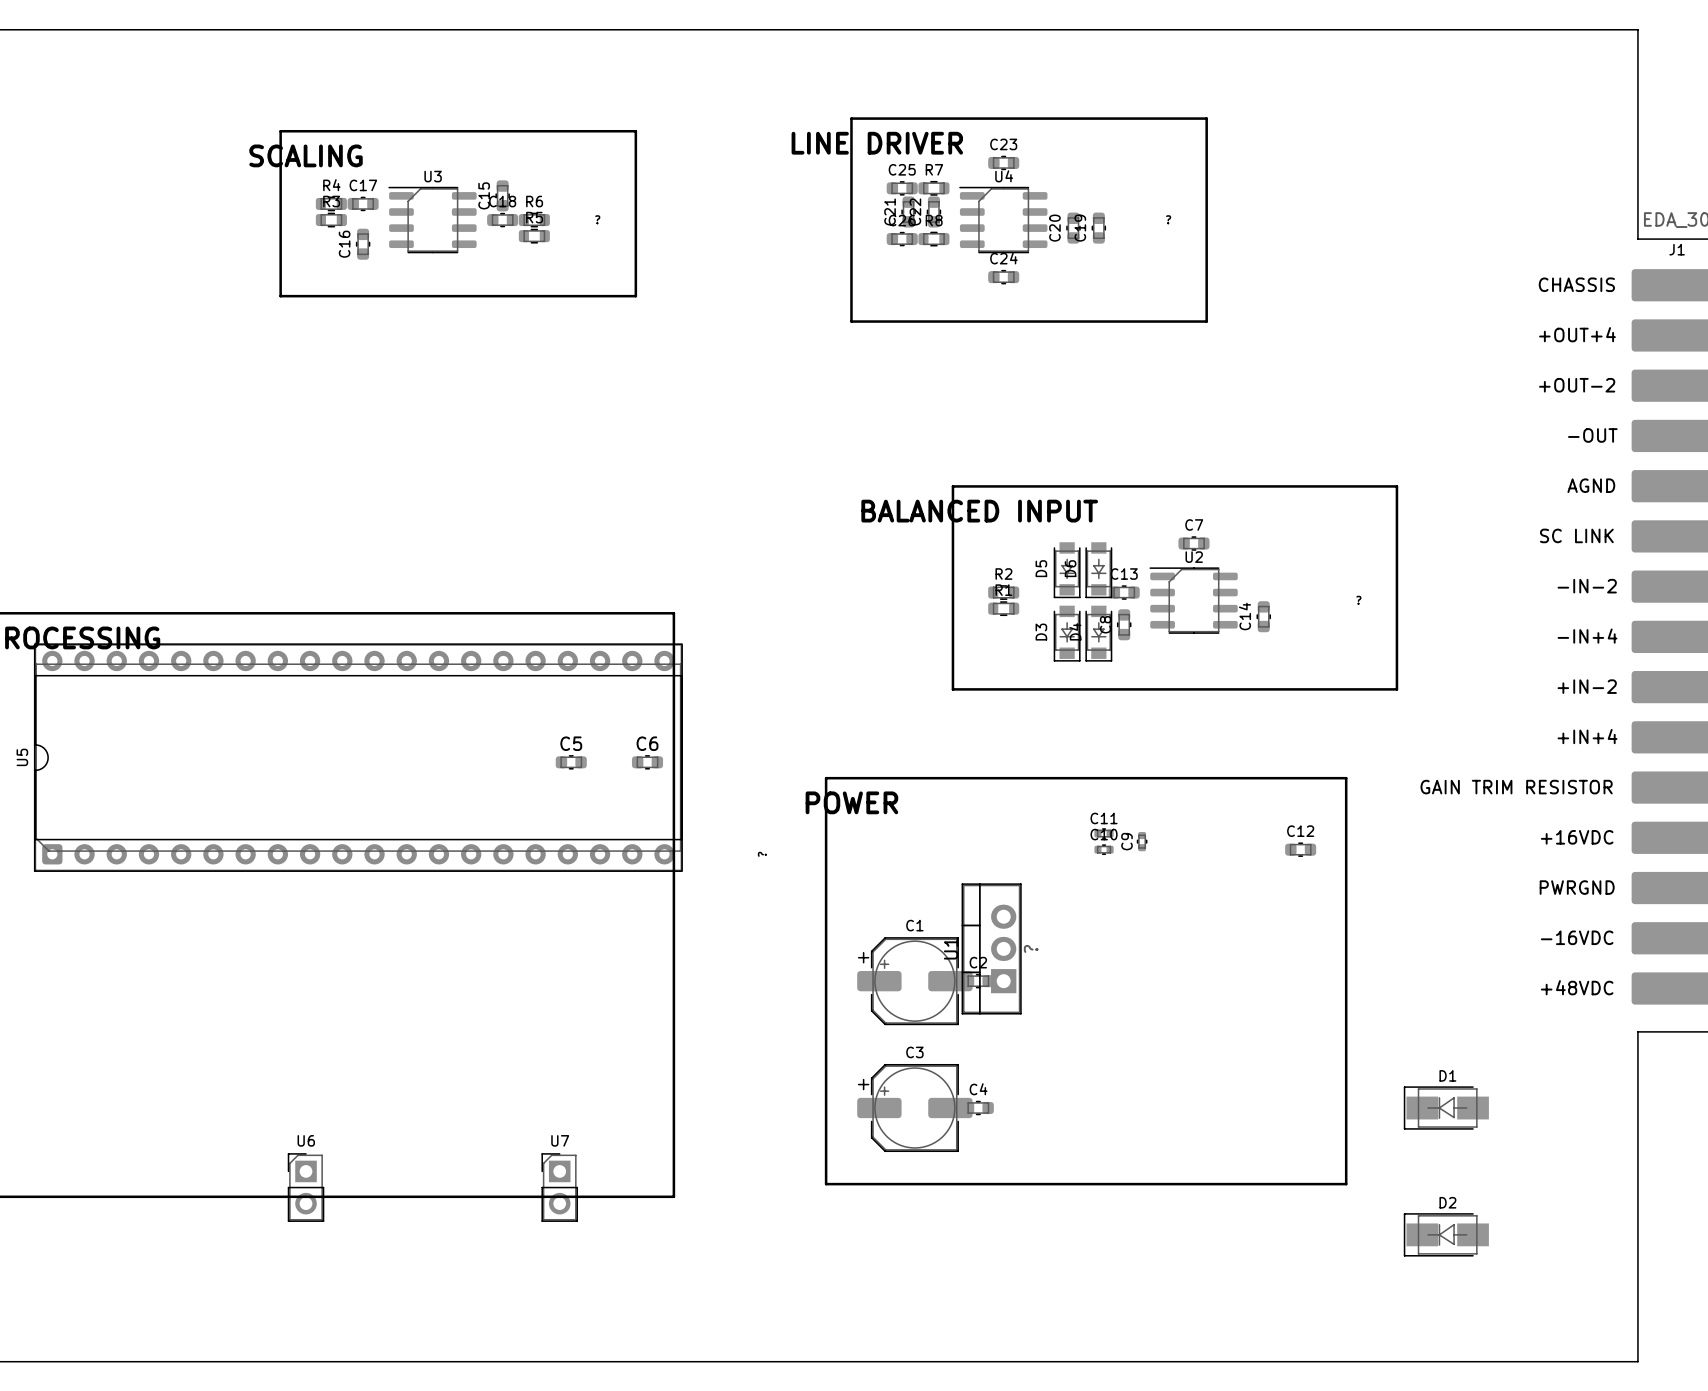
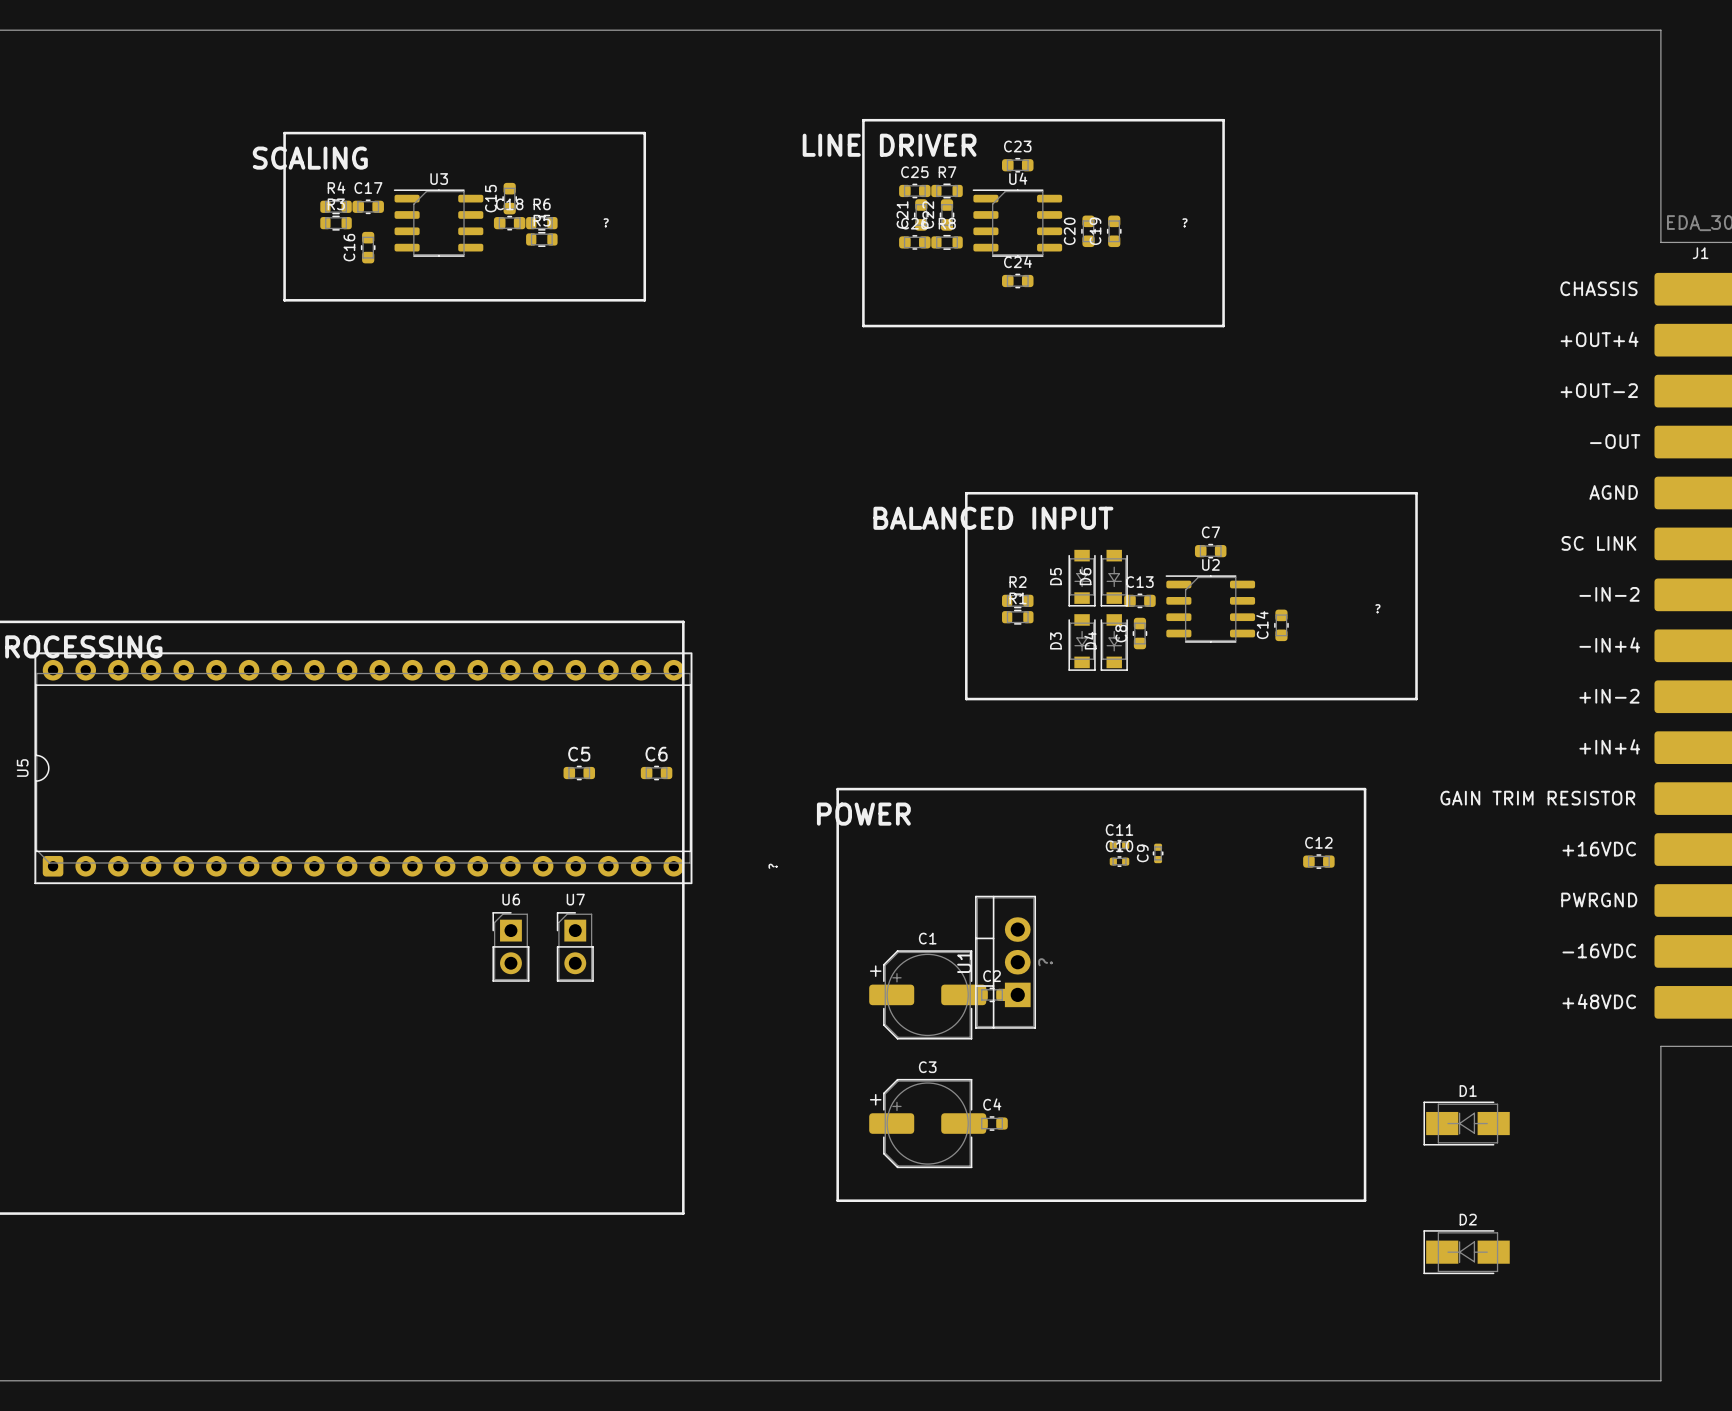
U6 position: (306, 1187) -> (510, 946)
U7 position: (559, 1187) -> (575, 946)

